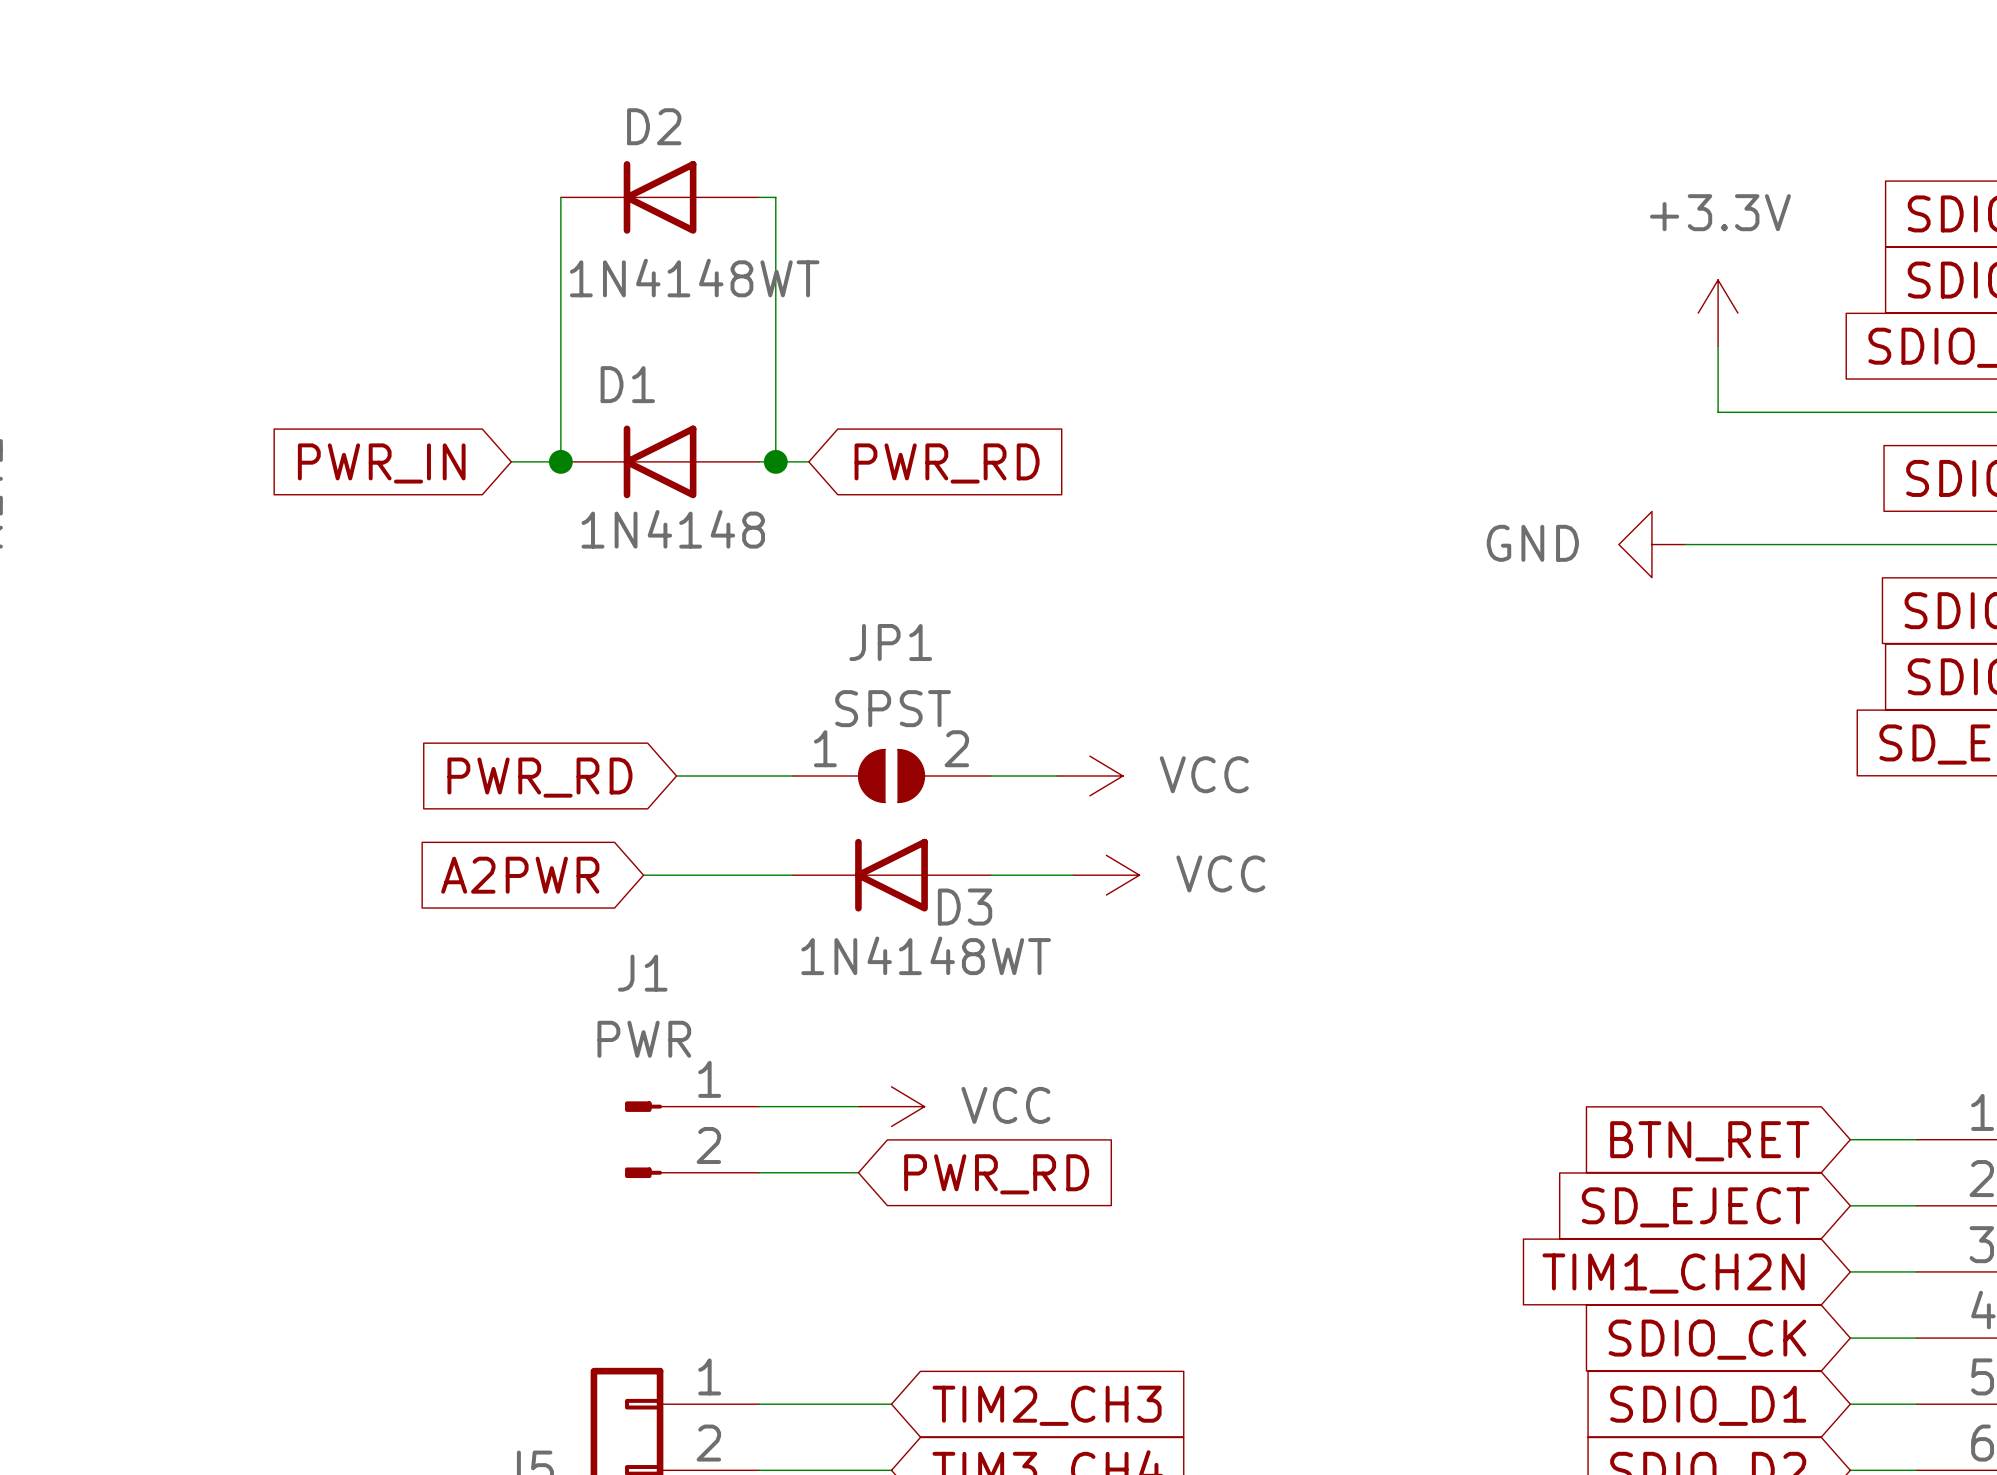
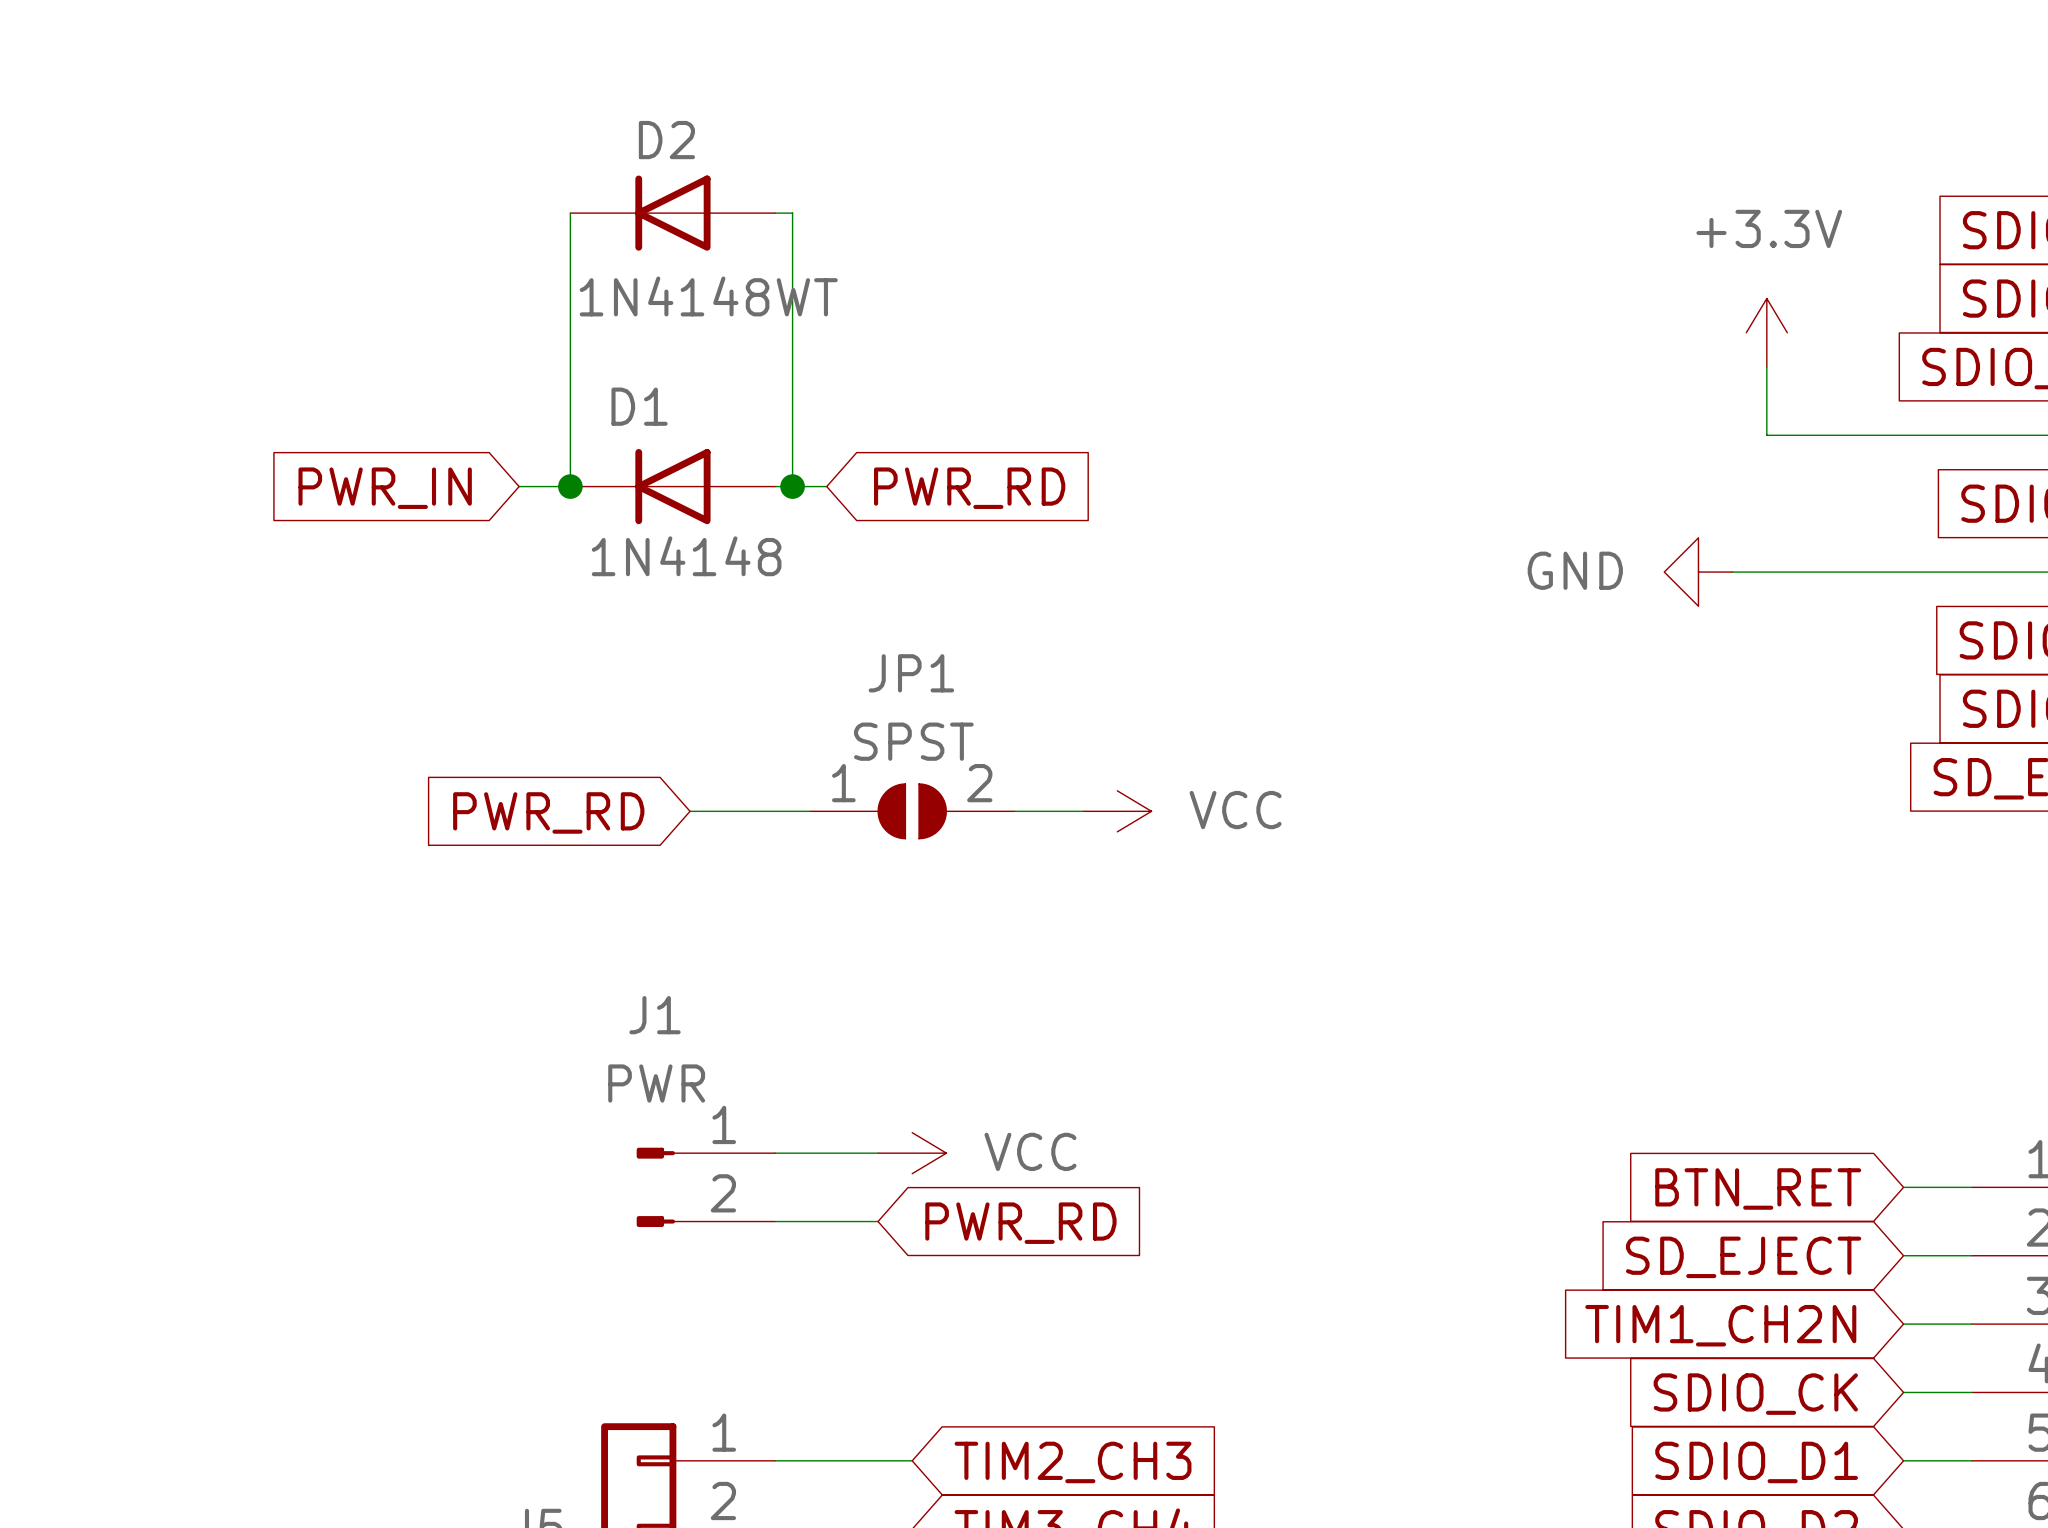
global label: A2PWR (520, 875) -> none
wire: (643, 875) (792, 875) -> none
D3: 1N4148WT (891, 875) -> none
wire: (990, 875) (1073, 875) -> none
power symbol: VCC (1106, 875) -> none

